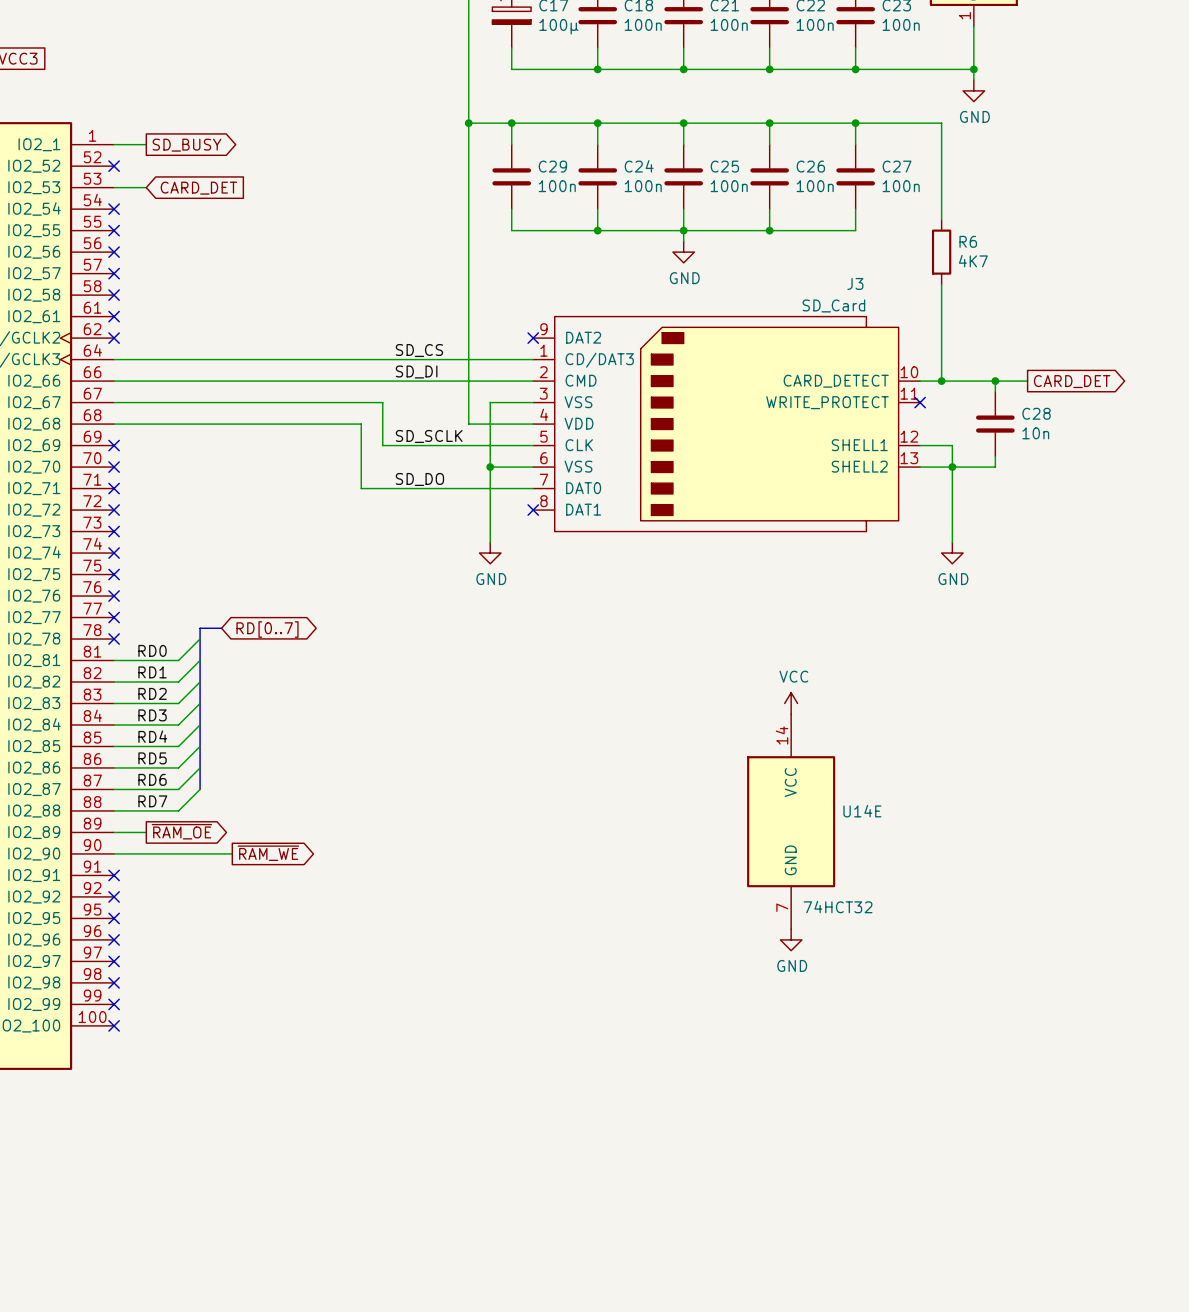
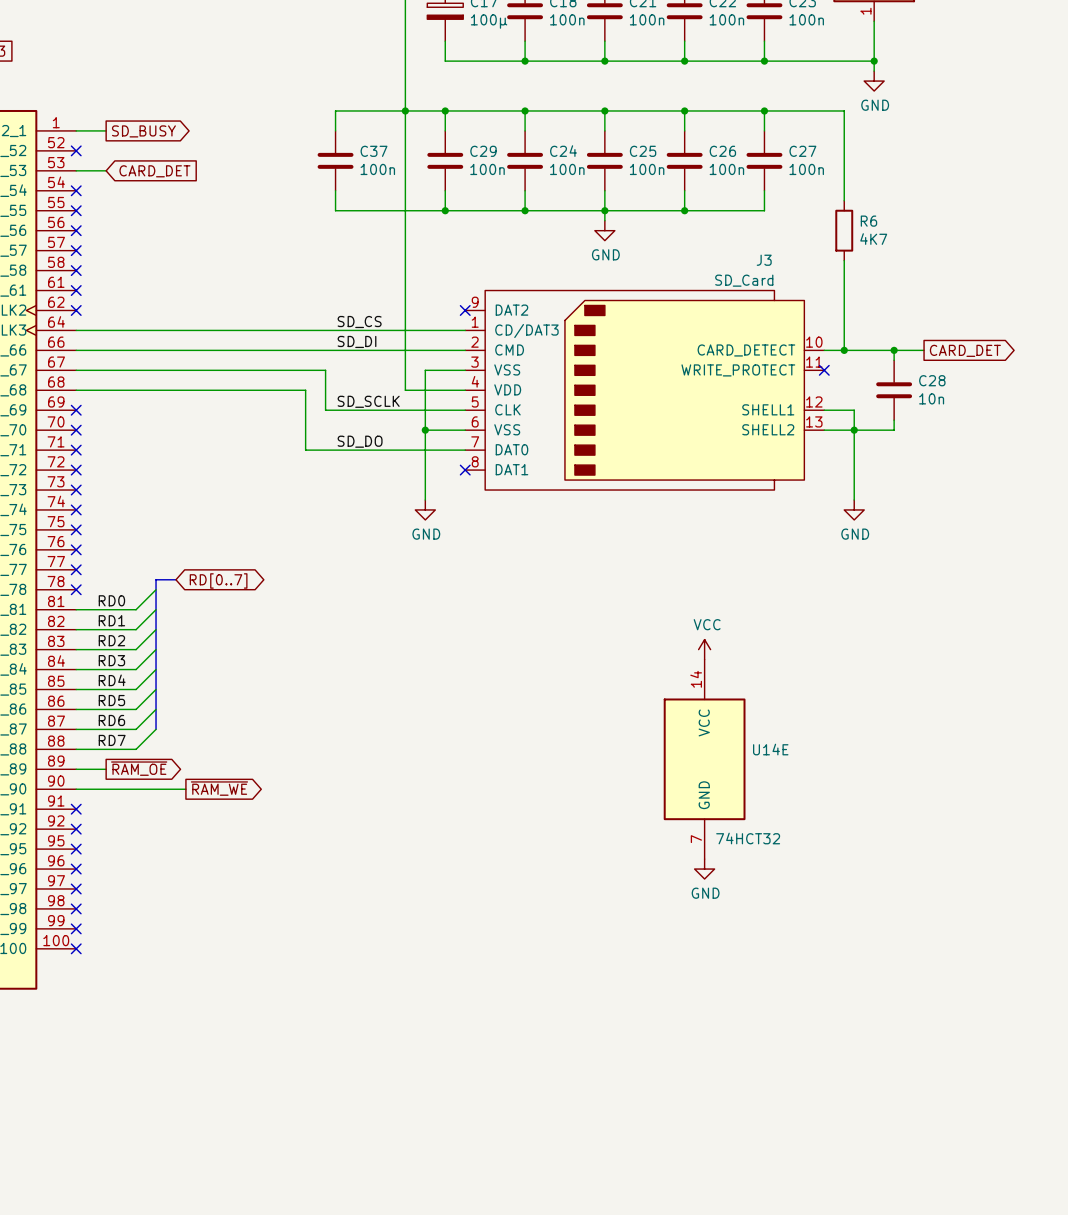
wire: none -> (405, 110) (335, 110) (335, 130)
C37: none -> 100n (335, 160)
wire: none -> (335, 190) (335, 210) (445, 210)
junction: none -> (445, 210)

